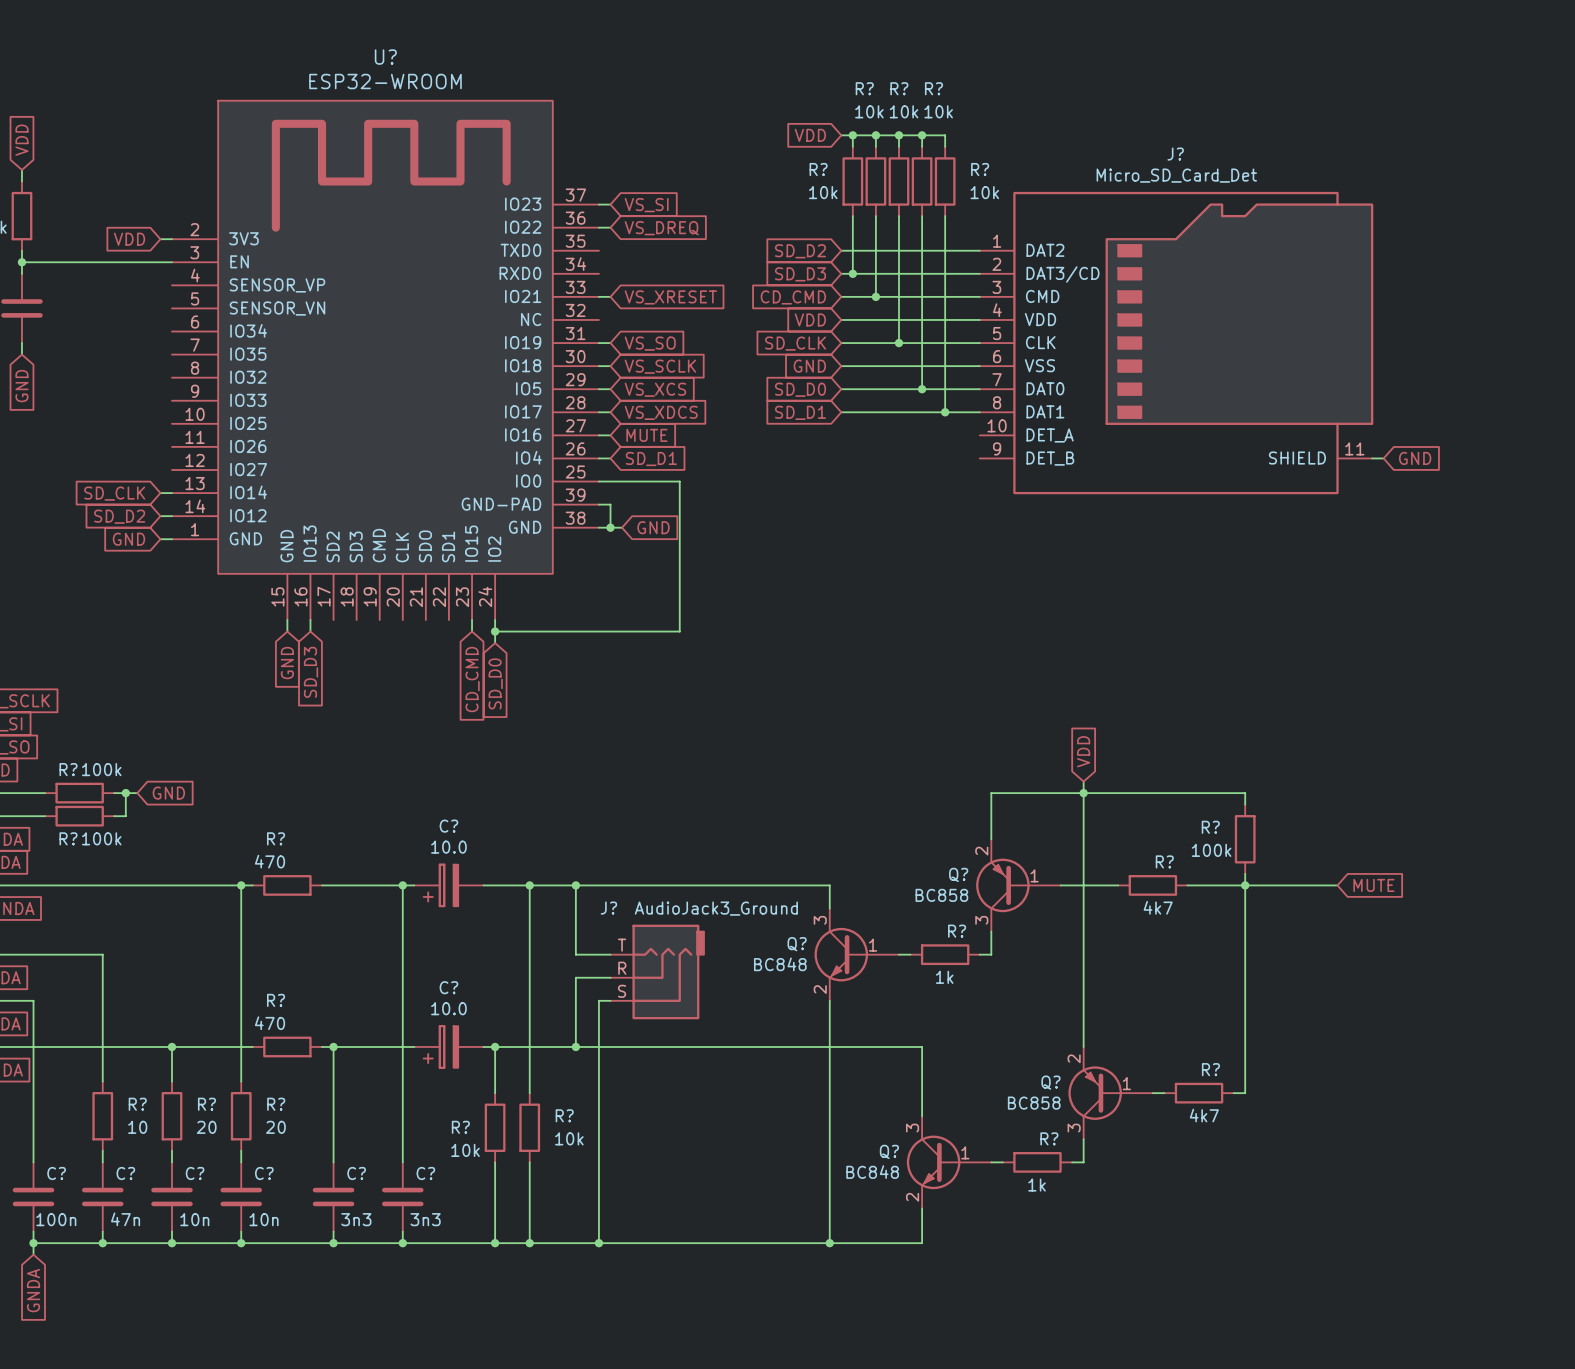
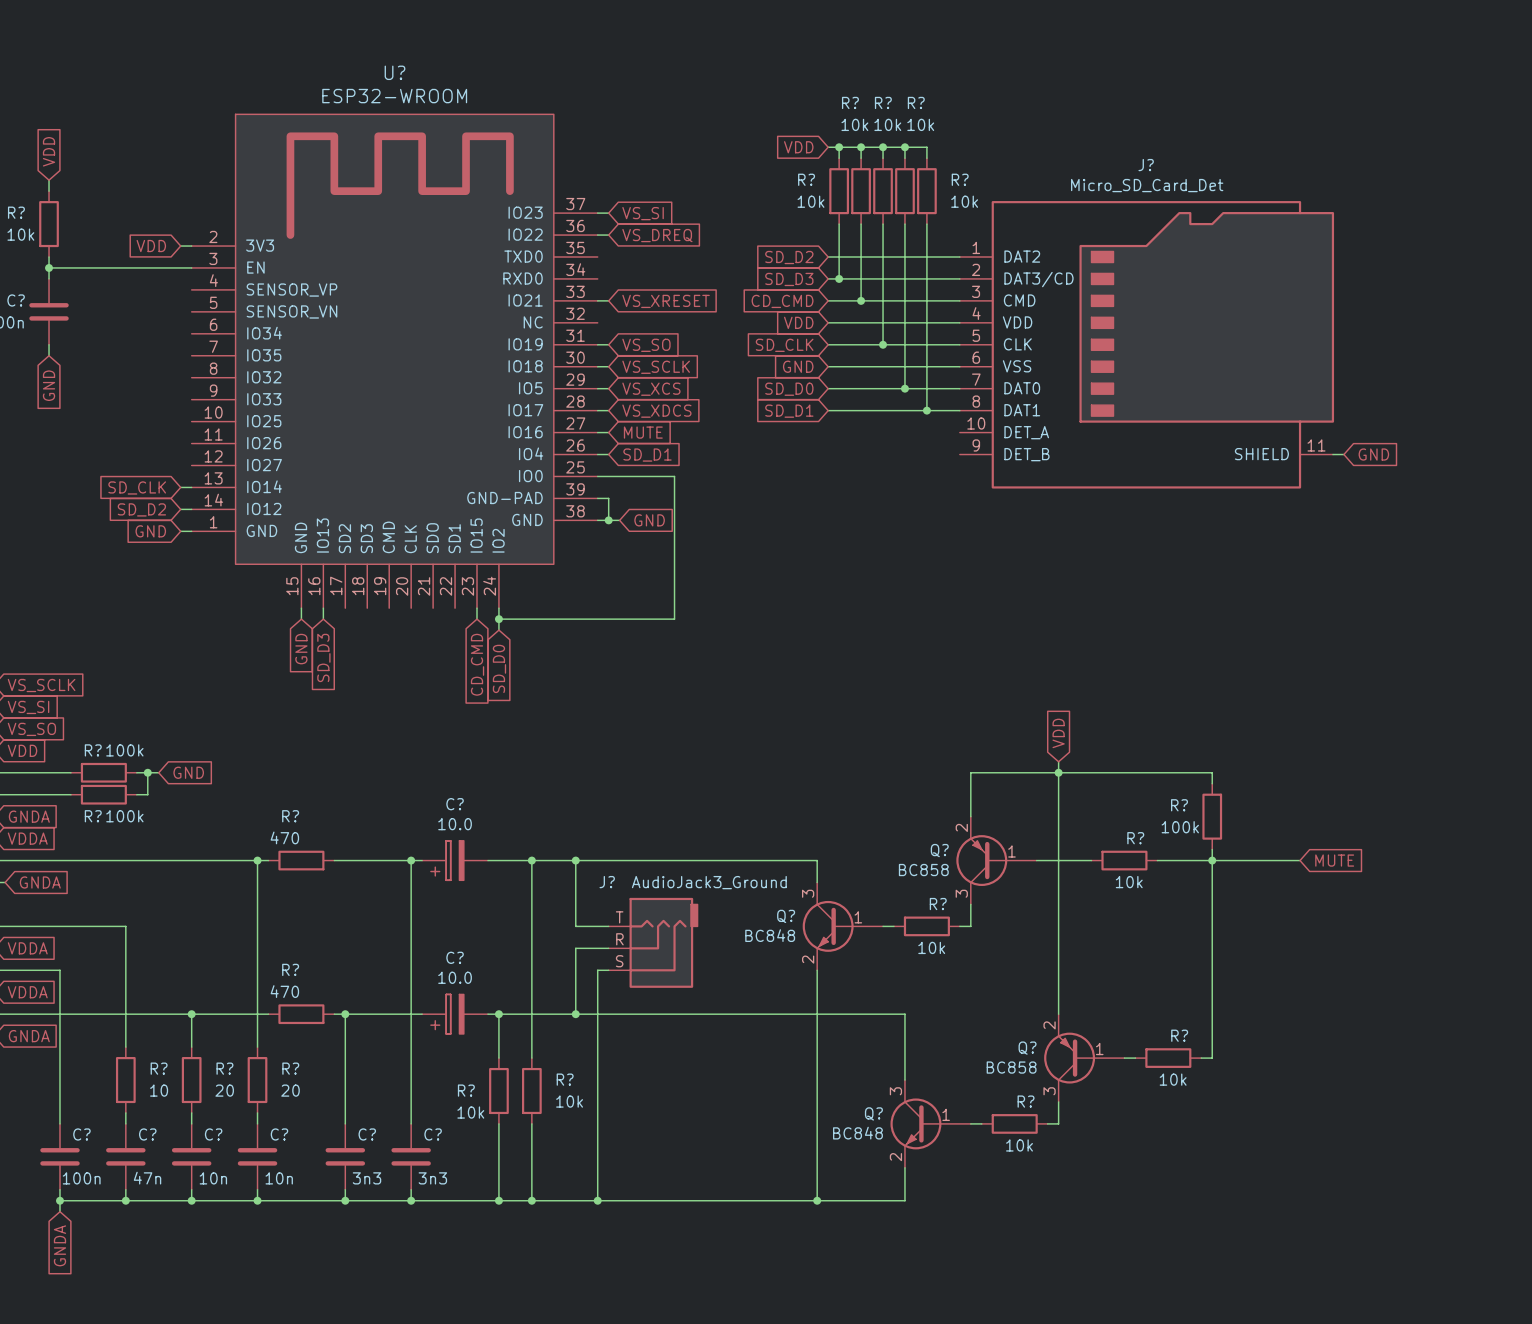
R? value: 4k7 (1158, 907) -> 10k (1129, 882)
R? value: 1k (944, 977) -> 10k (931, 947)
R? value: 4k7 (1204, 1115) -> 10k (1173, 1079)
R? value: 1k (1037, 1185) -> 10k (1019, 1145)

